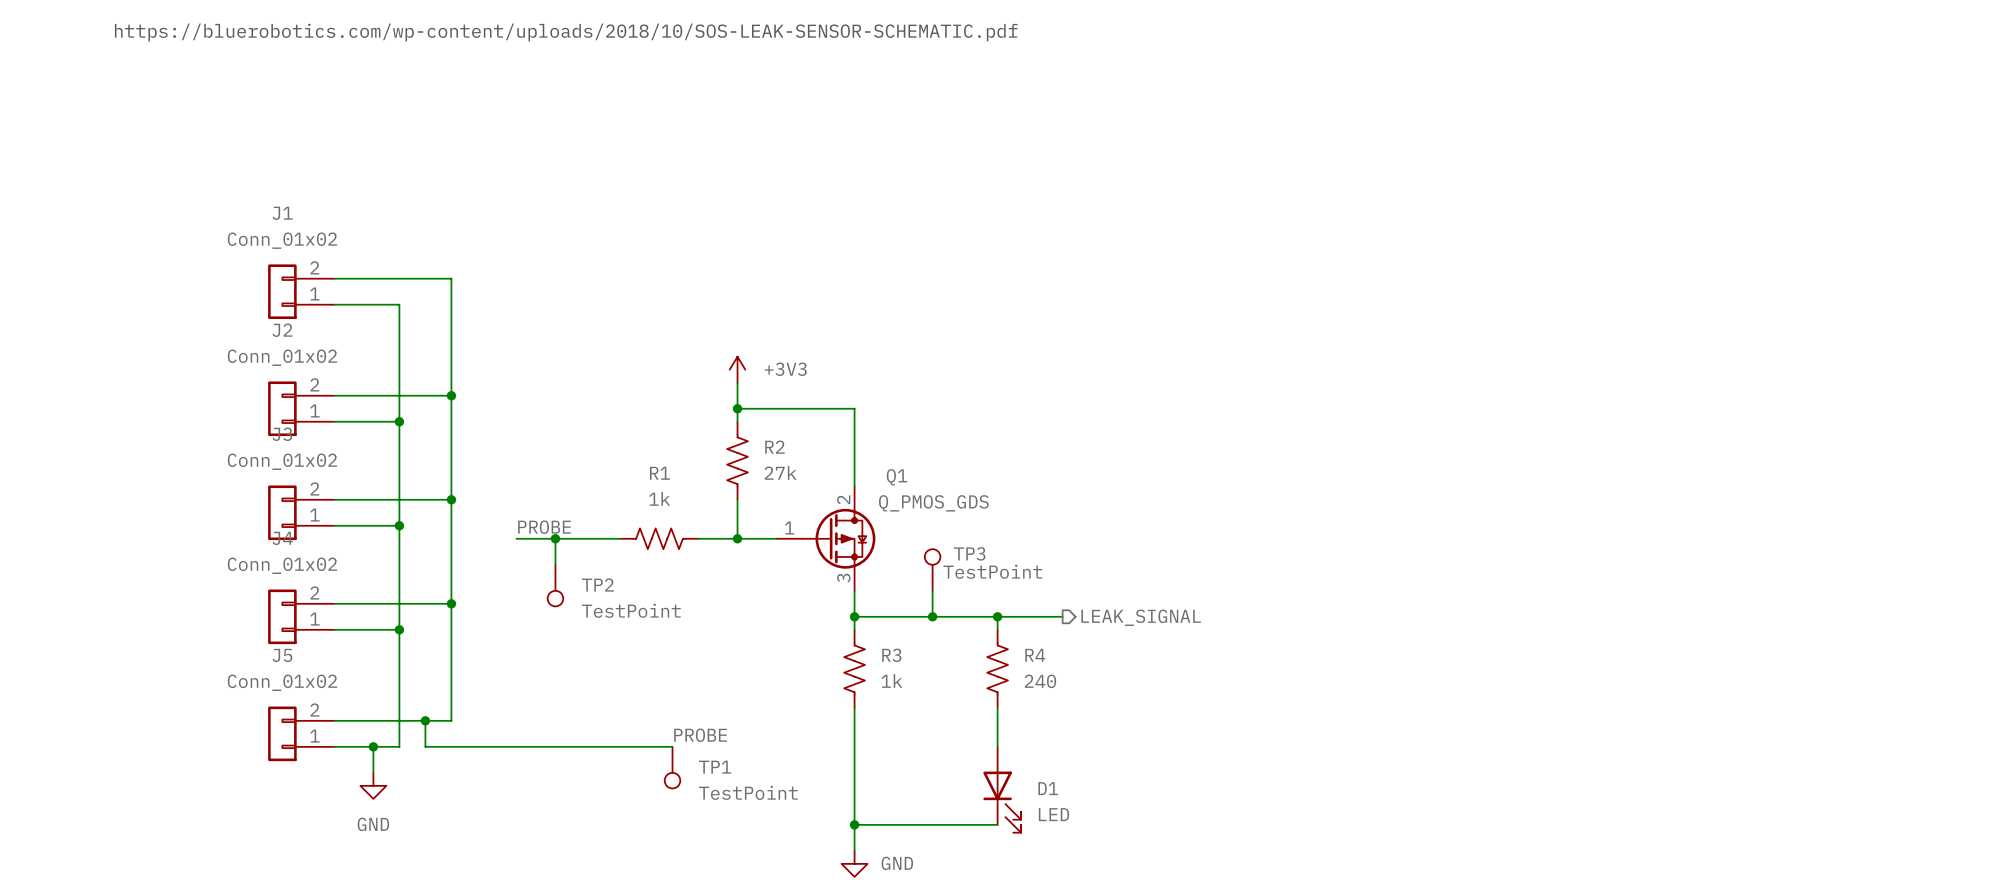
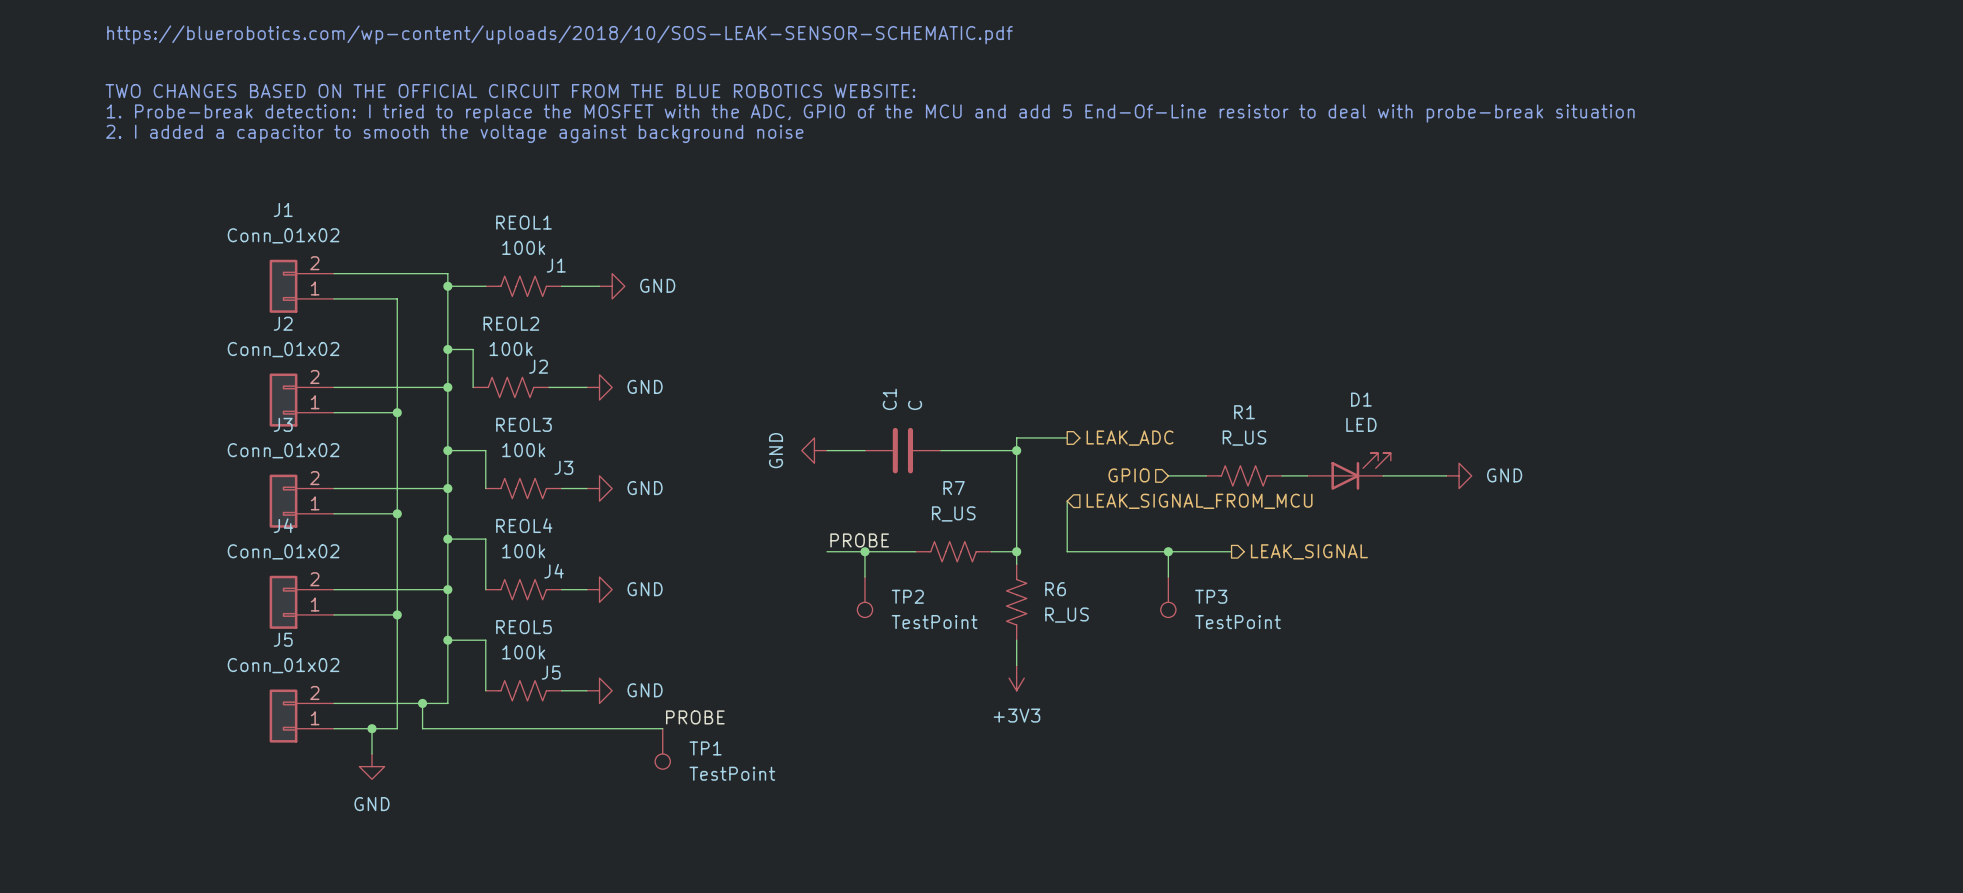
text: none -> TWO CHANGES BASED ON THE OFFICIAL CIRCUIT FROM THE BLUE ROBOTICS WEBSITE: (510, 91)
text: none -> 1. Probe-break detection: I tried to replace the MOSFET with the ADC, GPIO of the MCU and add 5 End-Of-Line resistor to deal with probe-break situation (870, 113)
text: none -> 2. I added a capacitor to smooth the voltage against background noise (454, 133)
wire: none -> (447, 286) (485, 286)
junction: none -> (447, 286)
REOL1: none -> 100k (523, 286)
wire: none -> (561, 286) (599, 286)
power symbol: none -> GND (612, 286)
wire: none -> (447, 349) (473, 349) (473, 387)
junction: none -> (447, 349)
power symbol: +3V3 (737, 369) -> none
wire: (737, 382) (737, 421) -> none
REOL2: none -> 100k (511, 387)
wire: none -> (548, 387) (586, 387)
power symbol: none -> GND (599, 387)
wire: (737, 408) (854, 408) (854, 486) -> none
junction: (737, 408) -> none
wire: none -> (1067, 437) (1016, 437) (1016, 564)
hierarchical label: none -> LEAK_ADC (1130, 438)
wire: none -> (447, 450) (485, 450) (485, 488)
junction: none -> (447, 450)
R2: 27k (737, 460) -> none
power symbol: none -> GND (814, 450)
wire: none -> (827, 450) (864, 450)
C1: none -> C (902, 450)
wire: none -> (940, 450) (1016, 450)
junction: none -> (1016, 450)
hierarchical label: none -> GPIO (1129, 475)
wire: none -> (1168, 475) (1206, 475)
wire: none -> (1282, 475) (1307, 475)
wire: none -> (1383, 475) (1446, 475)
power symbol: none -> GND (1459, 475)
R1 value: 1k (659, 498) -> R_US (1244, 438)
REOL3: none -> 100k (523, 488)
wire: none -> (561, 488) (586, 488)
power symbol: none -> GND (599, 488)
wire: (737, 499) (737, 538) -> none
wire: none -> (1067, 501) (1067, 551) (1231, 551)
hierarchical label: none -> LEAK_SIGNAL_FROM_MCU (1199, 501)
label: PROBE (544, 527) -> none
wire: (516, 538) (620, 538) -> none
wire: (555, 538) (555, 564) -> none
junction: (555, 538) -> none
R1 position: (659, 538) -> (1244, 475)
wire: (698, 538) (776, 538) -> none
junction: (737, 538) -> none
Q1: Q_PMOS_GDS (825, 538) -> none
wire: none -> (447, 539) (485, 539) (485, 589)
junction: none -> (447, 539)
label: none -> PROBE (859, 540)
TP3 rotation: 0° (932, 556) -> 180° (1168, 609)
wire: none -> (827, 551) (915, 551)
junction: none -> (864, 551)
R7: none -> R_US (953, 551)
wire: none -> (991, 551) (1016, 551)
junction: none -> (1016, 551)
wire: none -> (1168, 551) (1168, 577)
junction: none -> (1168, 551)
TP3 position: (932, 569) -> (1168, 597)
TP3 value position: TestPoint (992, 571) -> TestPoint (1237, 622)
TP2 position: (555, 585) -> (864, 597)
wire: (854, 590) (854, 629) -> none
wire: (932, 590) (932, 616) -> (864, 551) (864, 577)
REOL4: none -> 100k (523, 589)
wire: none -> (561, 589) (586, 589)
power symbol: none -> GND (599, 589)
wire: (854, 616) (1062, 616) -> none
junction: (854, 616) -> none
junction: (932, 616) -> none
wire: (997, 616) (997, 629) -> none
junction: (997, 616) -> none
R6: none -> R_US (1016, 602)
hierarchical label position: LEAK_SIGNAL (1141, 617) -> LEAK_SIGNAL (1309, 551)
wire: none -> (447, 640) (485, 640) (485, 690)
junction: none -> (447, 640)
wire: none -> (1016, 640) (1016, 665)
R3: 1k (854, 668) -> none
R4: 240 (997, 668) -> none
power symbol: none -> +3V3 (1016, 678)
REOL5: none -> 100k (523, 690)
wire: none -> (561, 690) (586, 690)
power symbol: none -> GND (599, 690)
wire: (854, 707) (854, 850) -> none
wire: (997, 707) (997, 746) -> none
D1 name position: D1 (1048, 788) -> D1 (1361, 399)
D1 position: (1002, 789) -> (1349, 471)
D1 rotation: 0° (1002, 802) -> 90° counterclockwise (1361, 471)
wire: (854, 824) (997, 824) -> none
junction: (854, 824) -> none
power symbol: GND (854, 863) -> none

